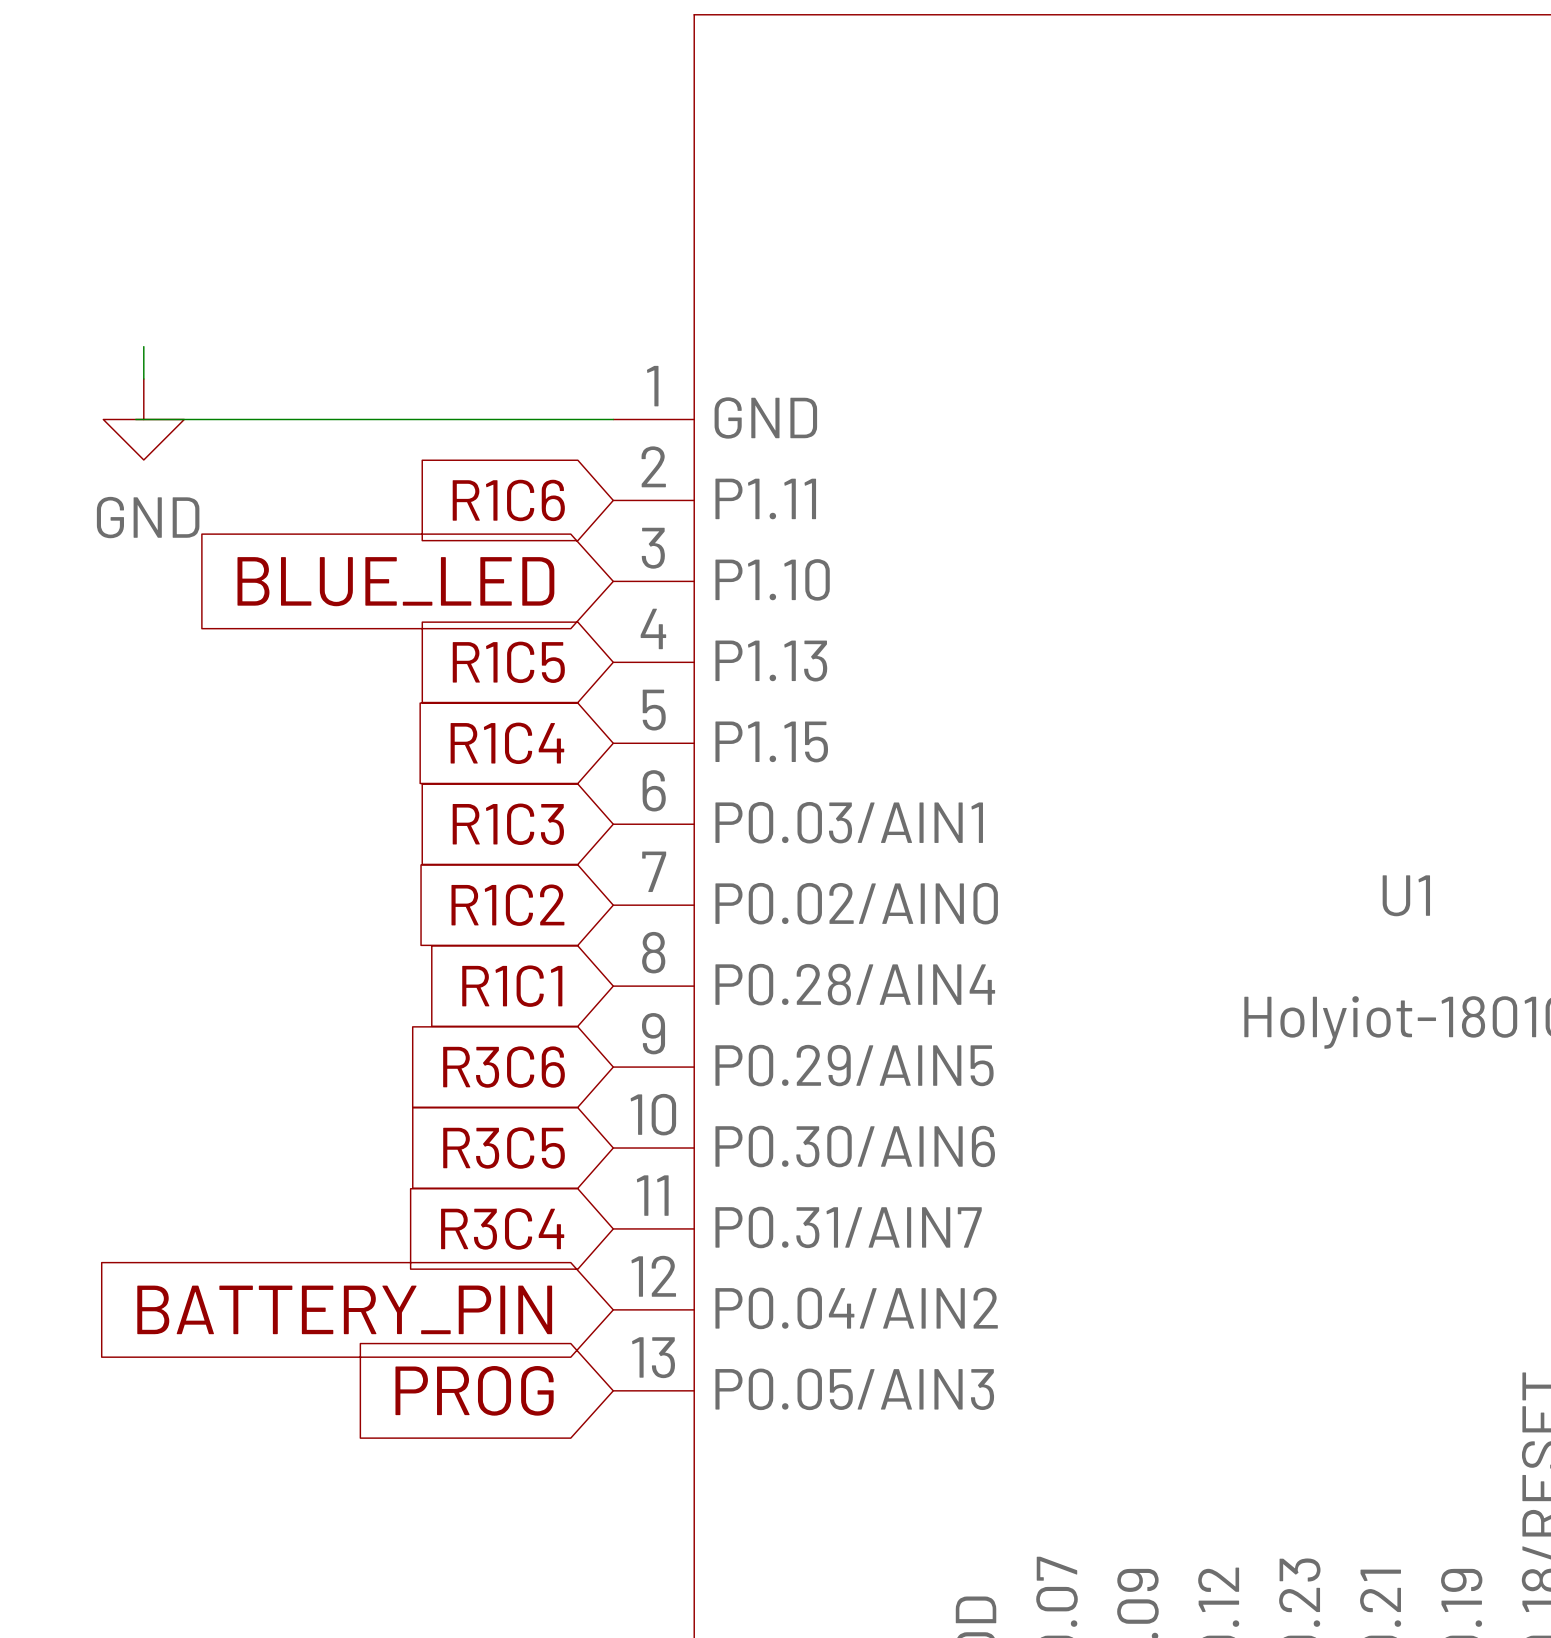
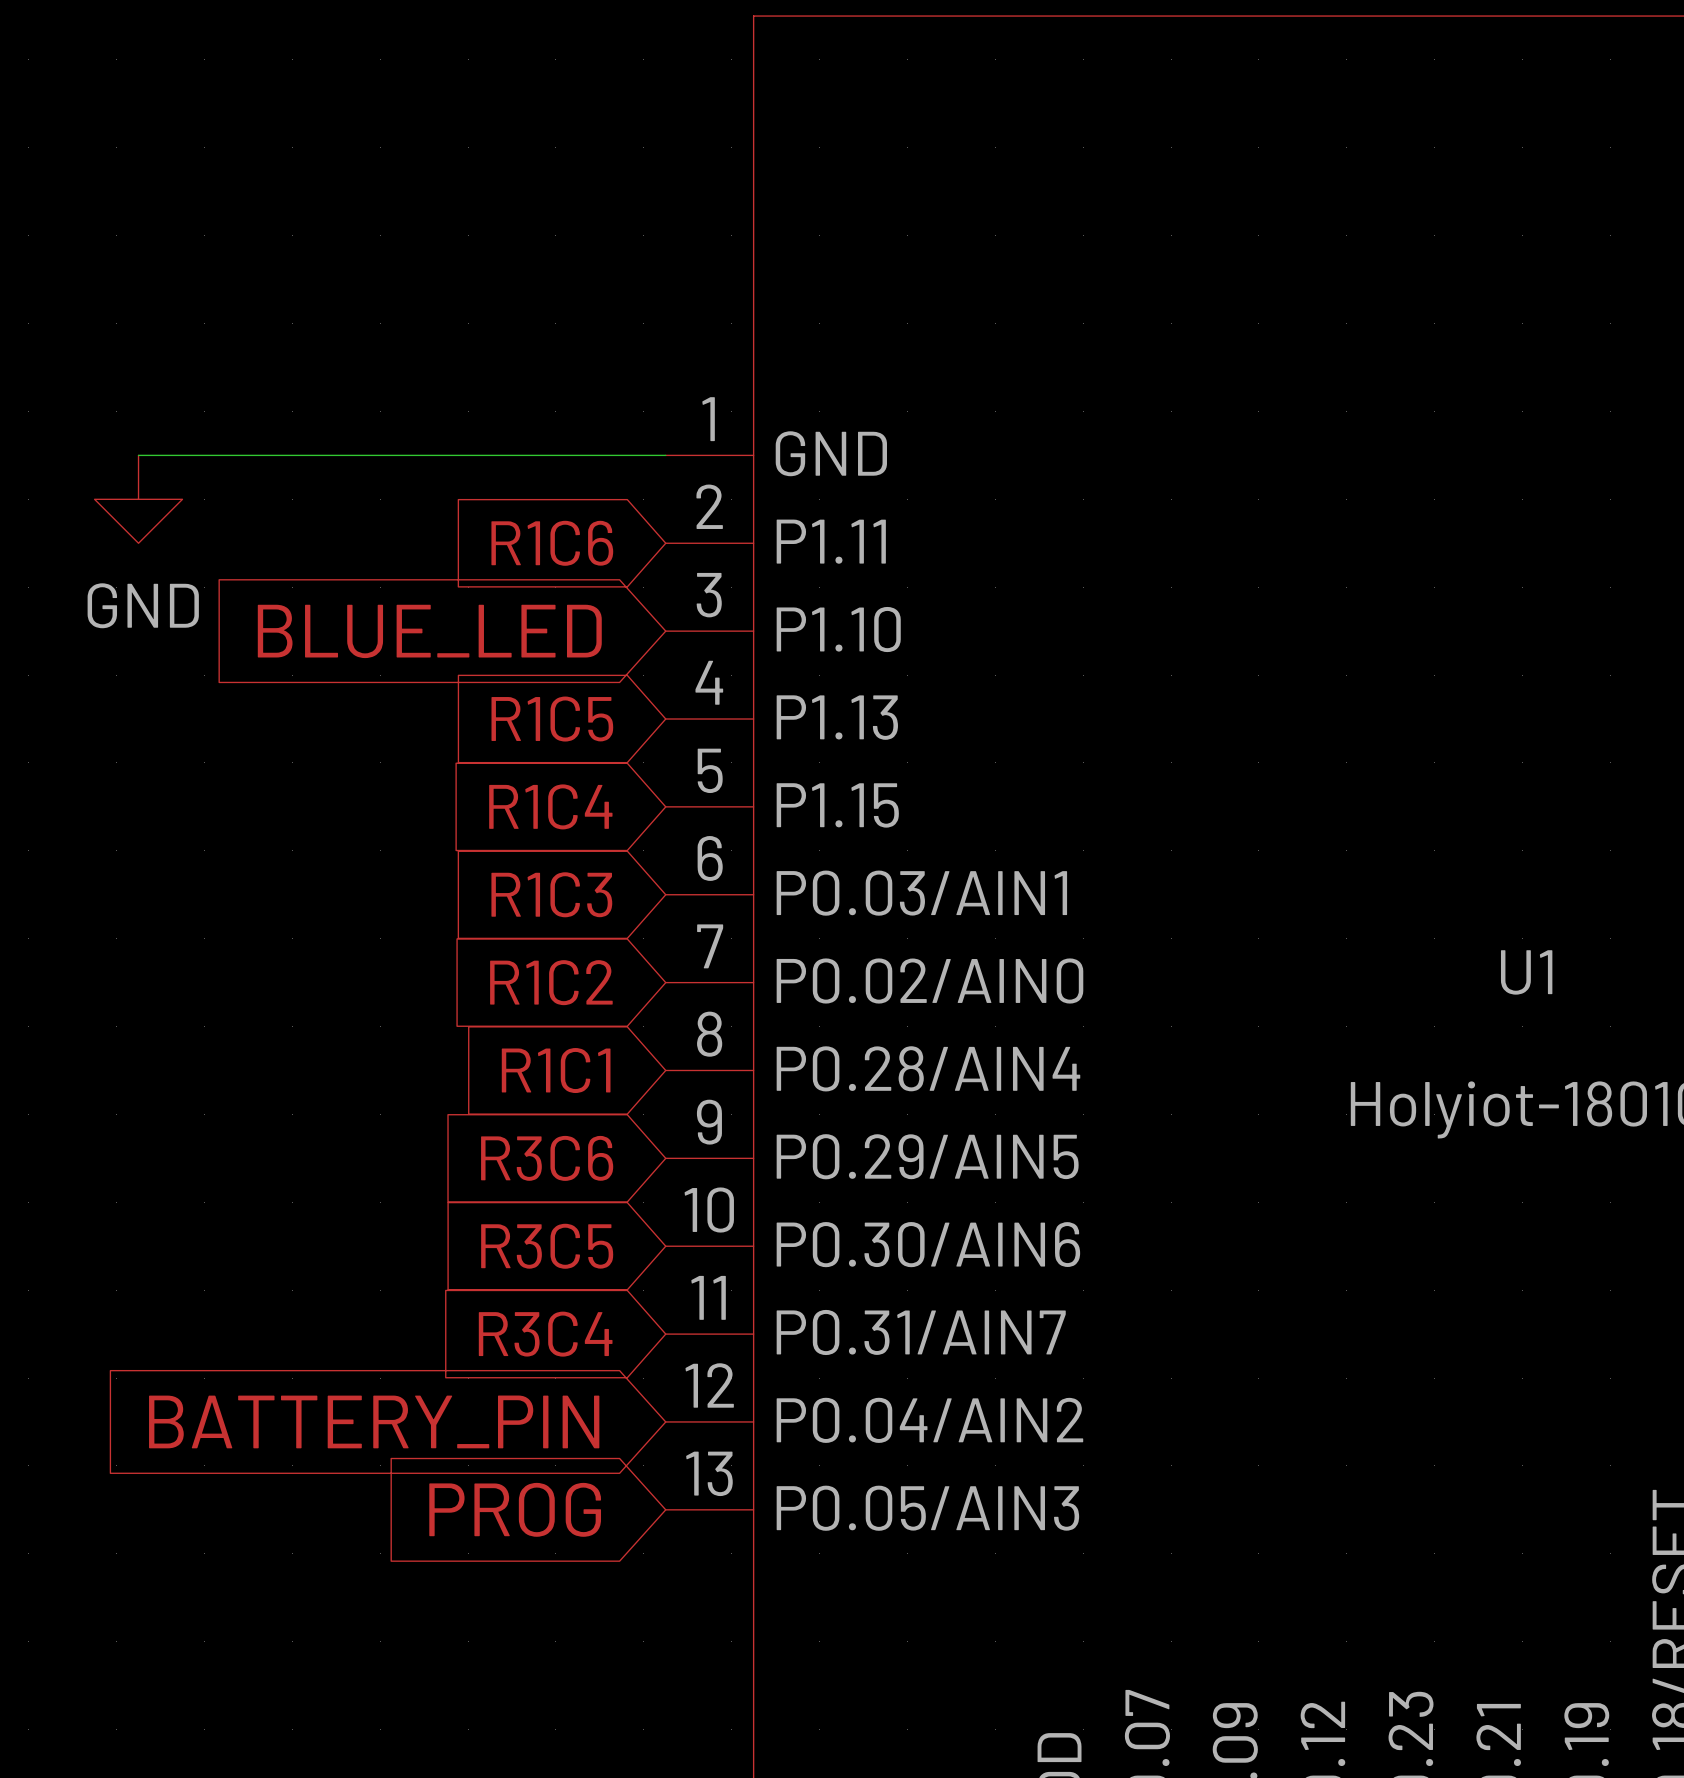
wire: (143, 346) (143, 379) -> none
power symbol position: GND (143, 419) -> GND (138, 499)

